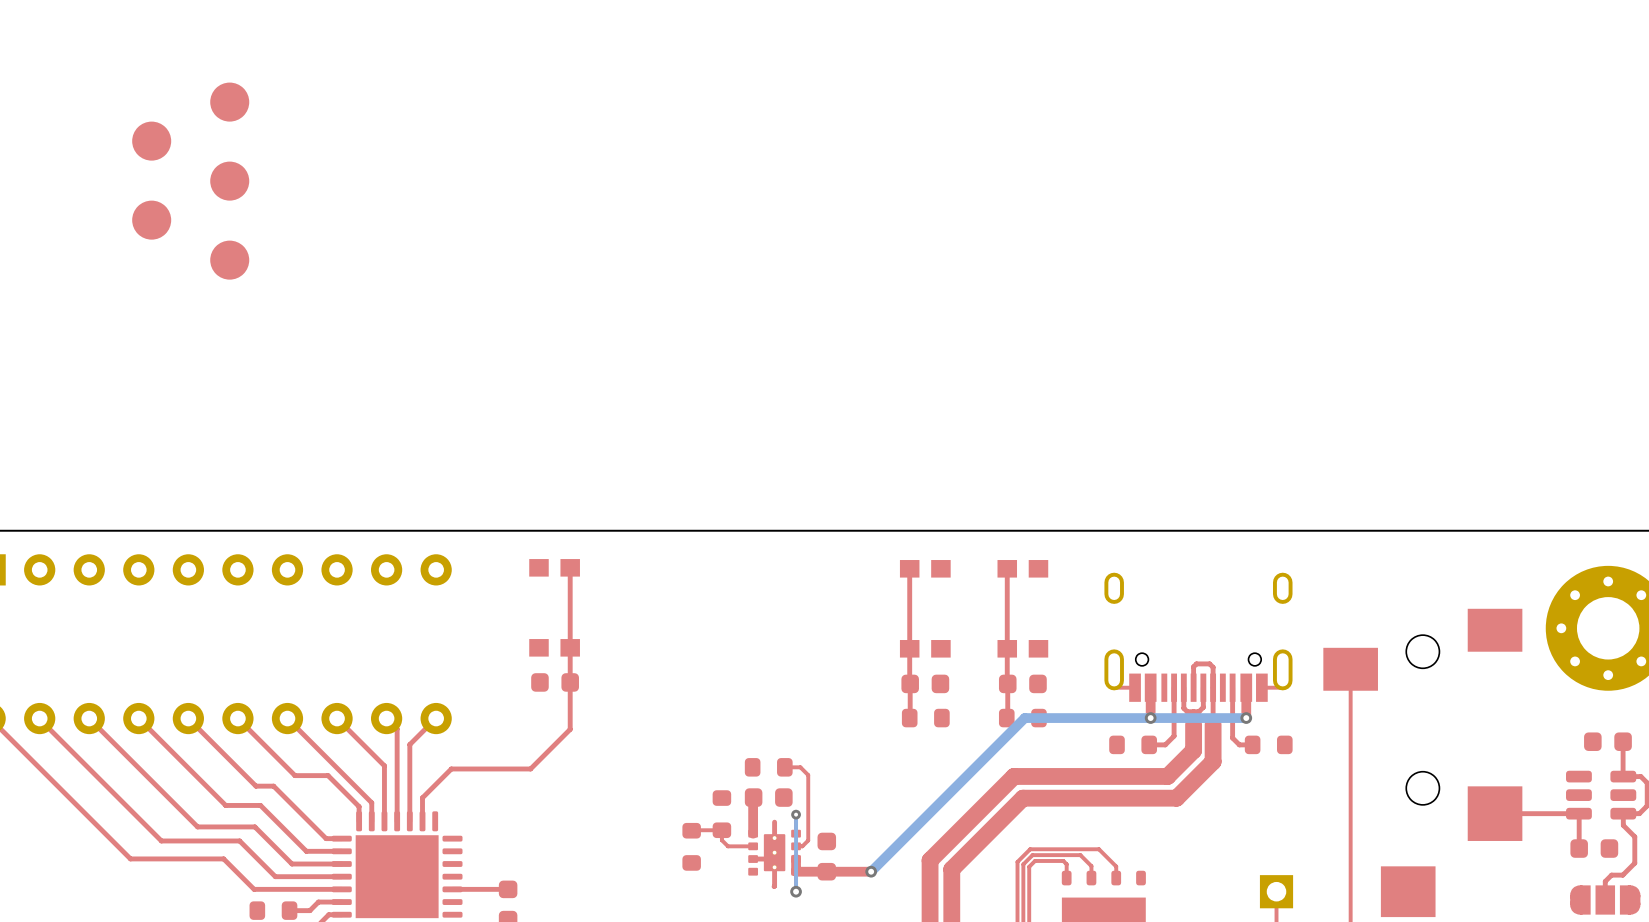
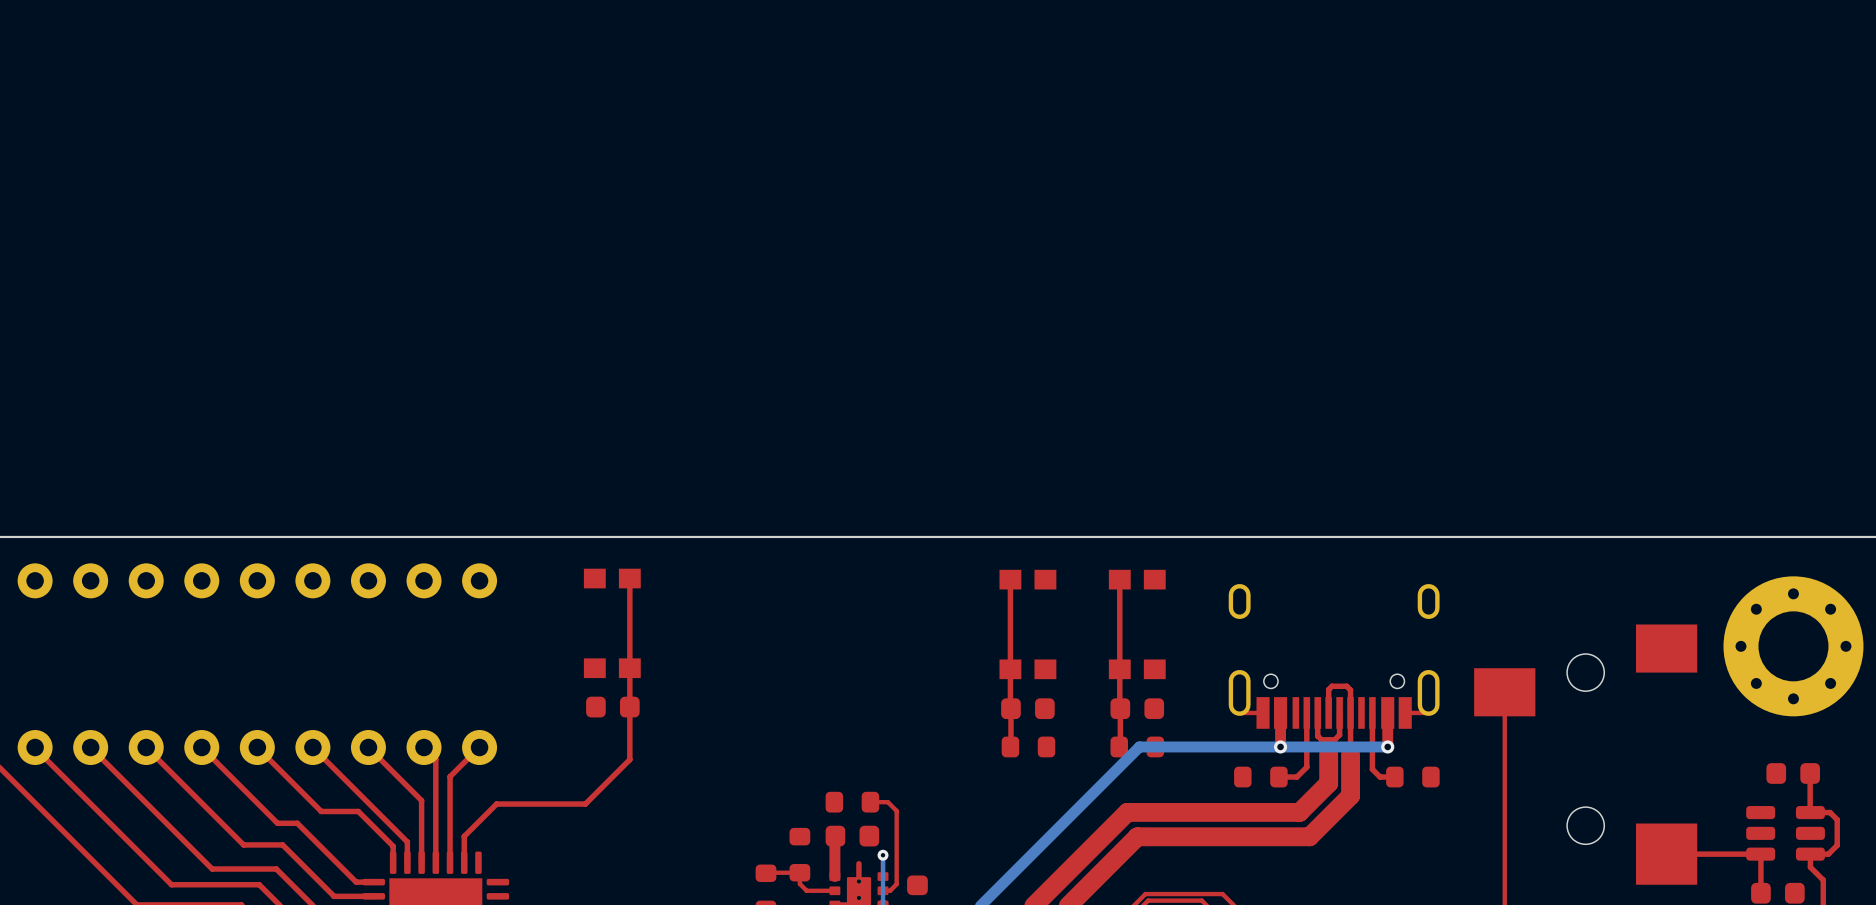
part: (229, 102) -> none
part: (151, 141) -> none
part: (229, 181) -> none
part: (151, 220) -> none
part: (229, 260) -> none

